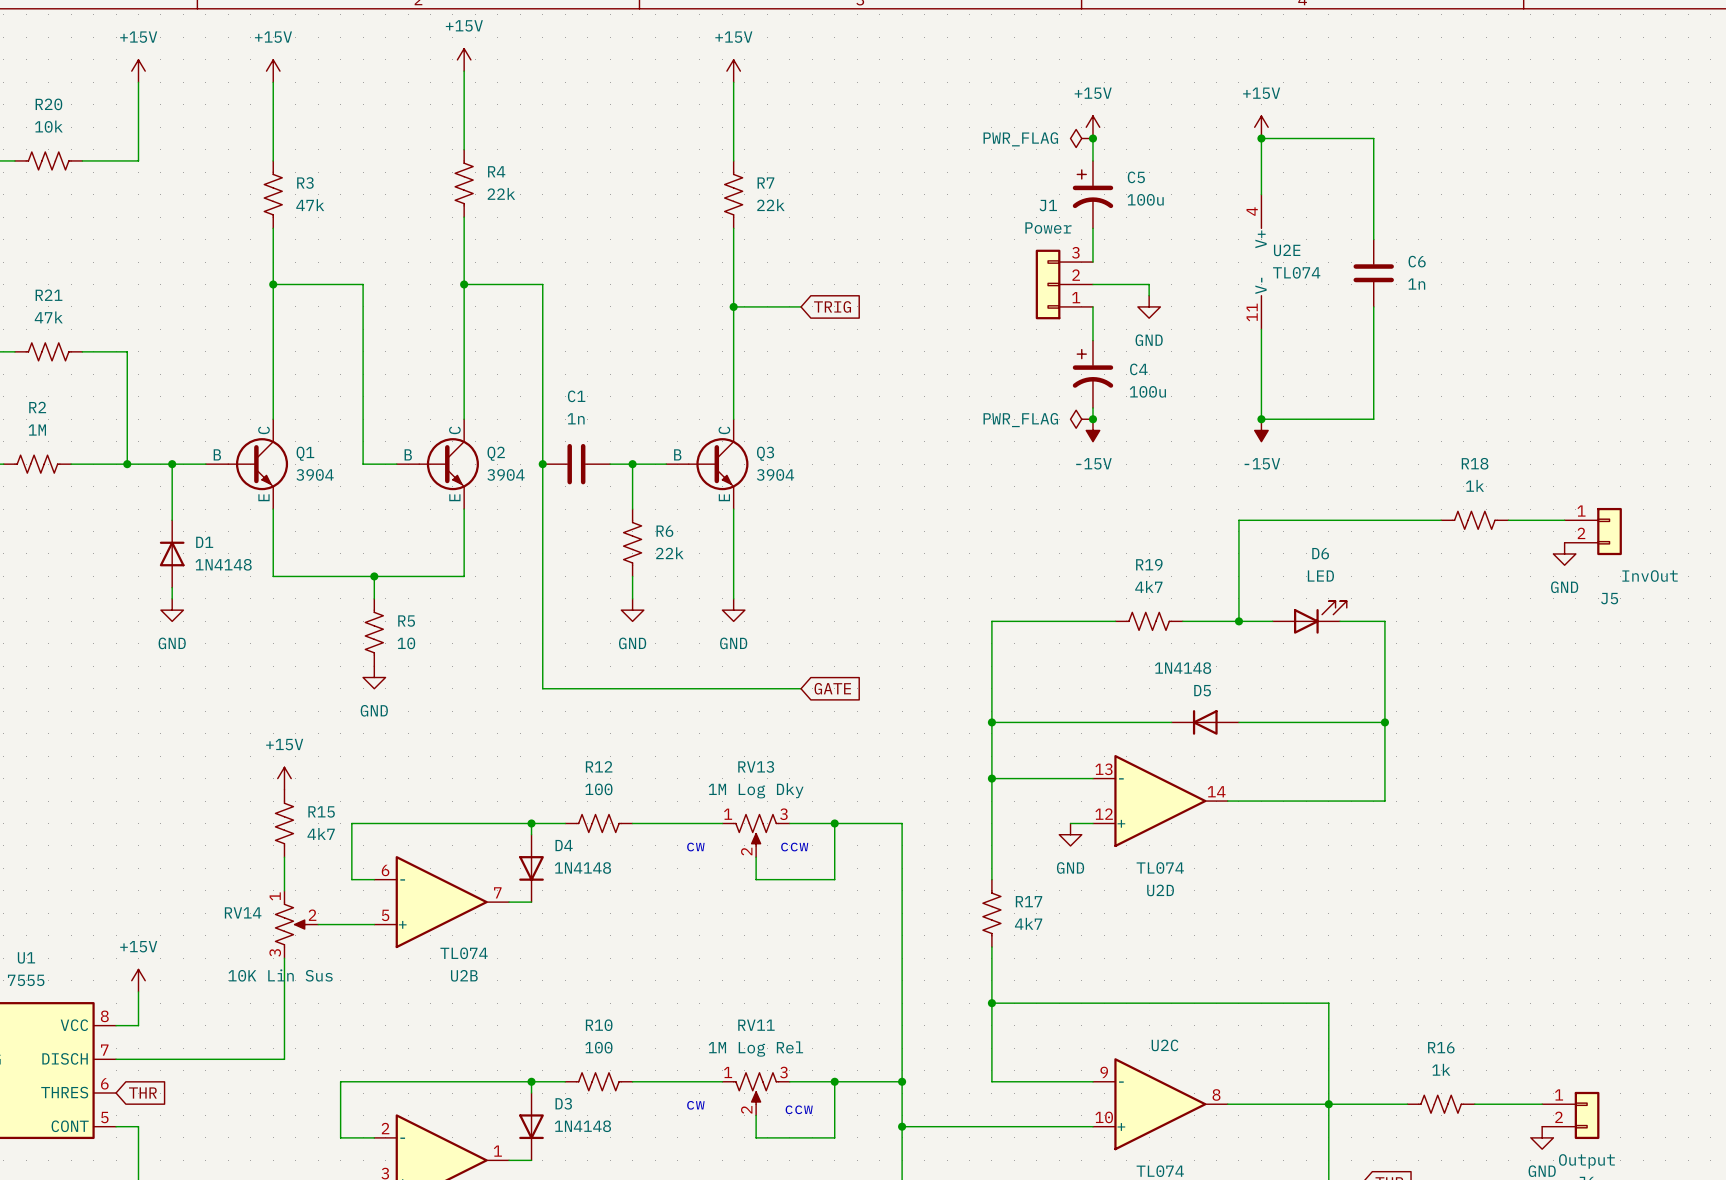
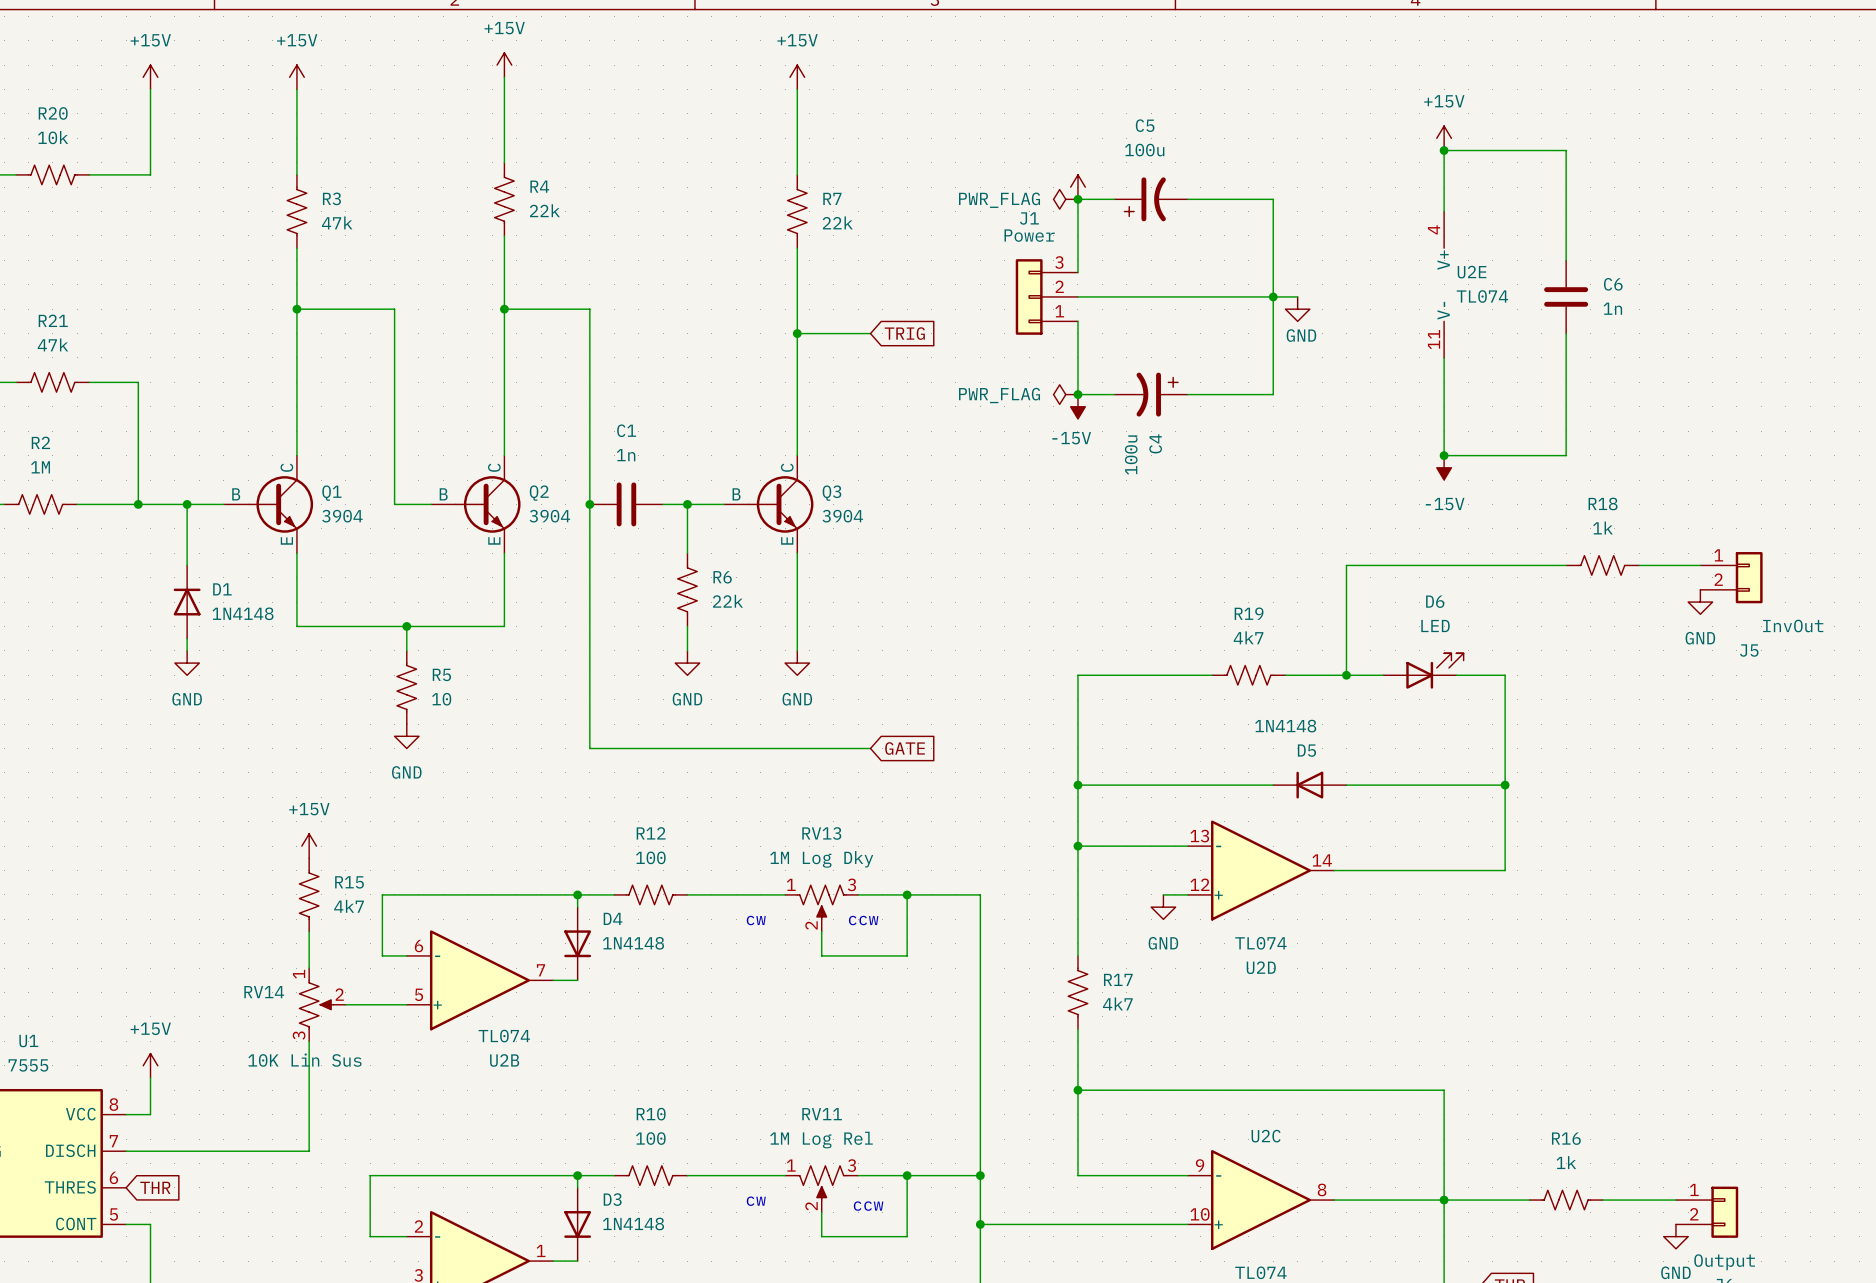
power symbol: +15V (1092, 127) -> none
power symbol position: +15V (1261, 127) -> +15V (1444, 138)
power symbol position: PWR_FLAG (1081, 138) -> PWR_FLAG (1065, 199)
wire: (1092, 138) (1092, 160) -> none
junction: (1092, 138) -> none
junction: (1261, 138) -> none
wire: (1328, 138) (1261, 138) (1261, 194) -> (1444, 150) (1444, 211)
junction: none -> (1444, 150)
wire: (1373, 138) (1373, 239) -> (1492, 150) (1566, 150) (1566, 260)
power symbol: none -> (1077, 187)
C5 name position: C5 (1136, 177) -> C5 (1145, 125)
junction: none -> (1077, 199)
wire: none -> (1114, 199) (1077, 199) (1077, 272)
wire: none -> (1187, 199) (1273, 199) (1273, 394) (1187, 394)
C5 rotation: 0° (1092, 189) -> 90° counterclockwise (1145, 199)
C5 value position: 100u (1145, 199) -> 100u (1144, 150)
J1 name position: J1 (1048, 205) -> J1 (1029, 218)
wire: (1092, 228) (1092, 262) -> none
U2E position: (1261, 262) -> (1444, 284)
wire: none -> (1077, 296) (1297, 296)
junction: none -> (1273, 296)
C6 position: (1373, 273) -> (1566, 296)
J1 position: (1064, 284) -> (1046, 296)
wire: (1092, 284) (1149, 284) (1149, 295) -> none
wire: none -> (1077, 321) (1077, 394) (1114, 394)
wire: (1092, 306) (1092, 340) -> none
power symbol position: GND (1149, 306) -> GND (1297, 309)
wire: (1373, 306) (1373, 419) -> (1566, 333) (1566, 455) (1492, 455)
wire: (1261, 329) (1261, 419) (1328, 419) -> (1444, 357) (1444, 455)
power symbol text position: GND (1149, 340) -> GND (1301, 335)
junction: none -> (1077, 394)
C4 rotation: 0° (1092, 368) -> 90° clockwise (1157, 394)
wire: (1092, 408) (1092, 419) -> none
power symbol position: PWR_FLAG (1081, 419) -> PWR_FLAG (1065, 394)
junction: (1092, 419) -> none
junction: (1261, 419) -> none
junction: none -> (1444, 455)
power symbol position: -15V (1092, 430) -> -15V (1077, 406)
power symbol position: -15V (1261, 430) -> -15V (1444, 467)
power symbol text position: -15V (1093, 463) -> -15V (1071, 438)

